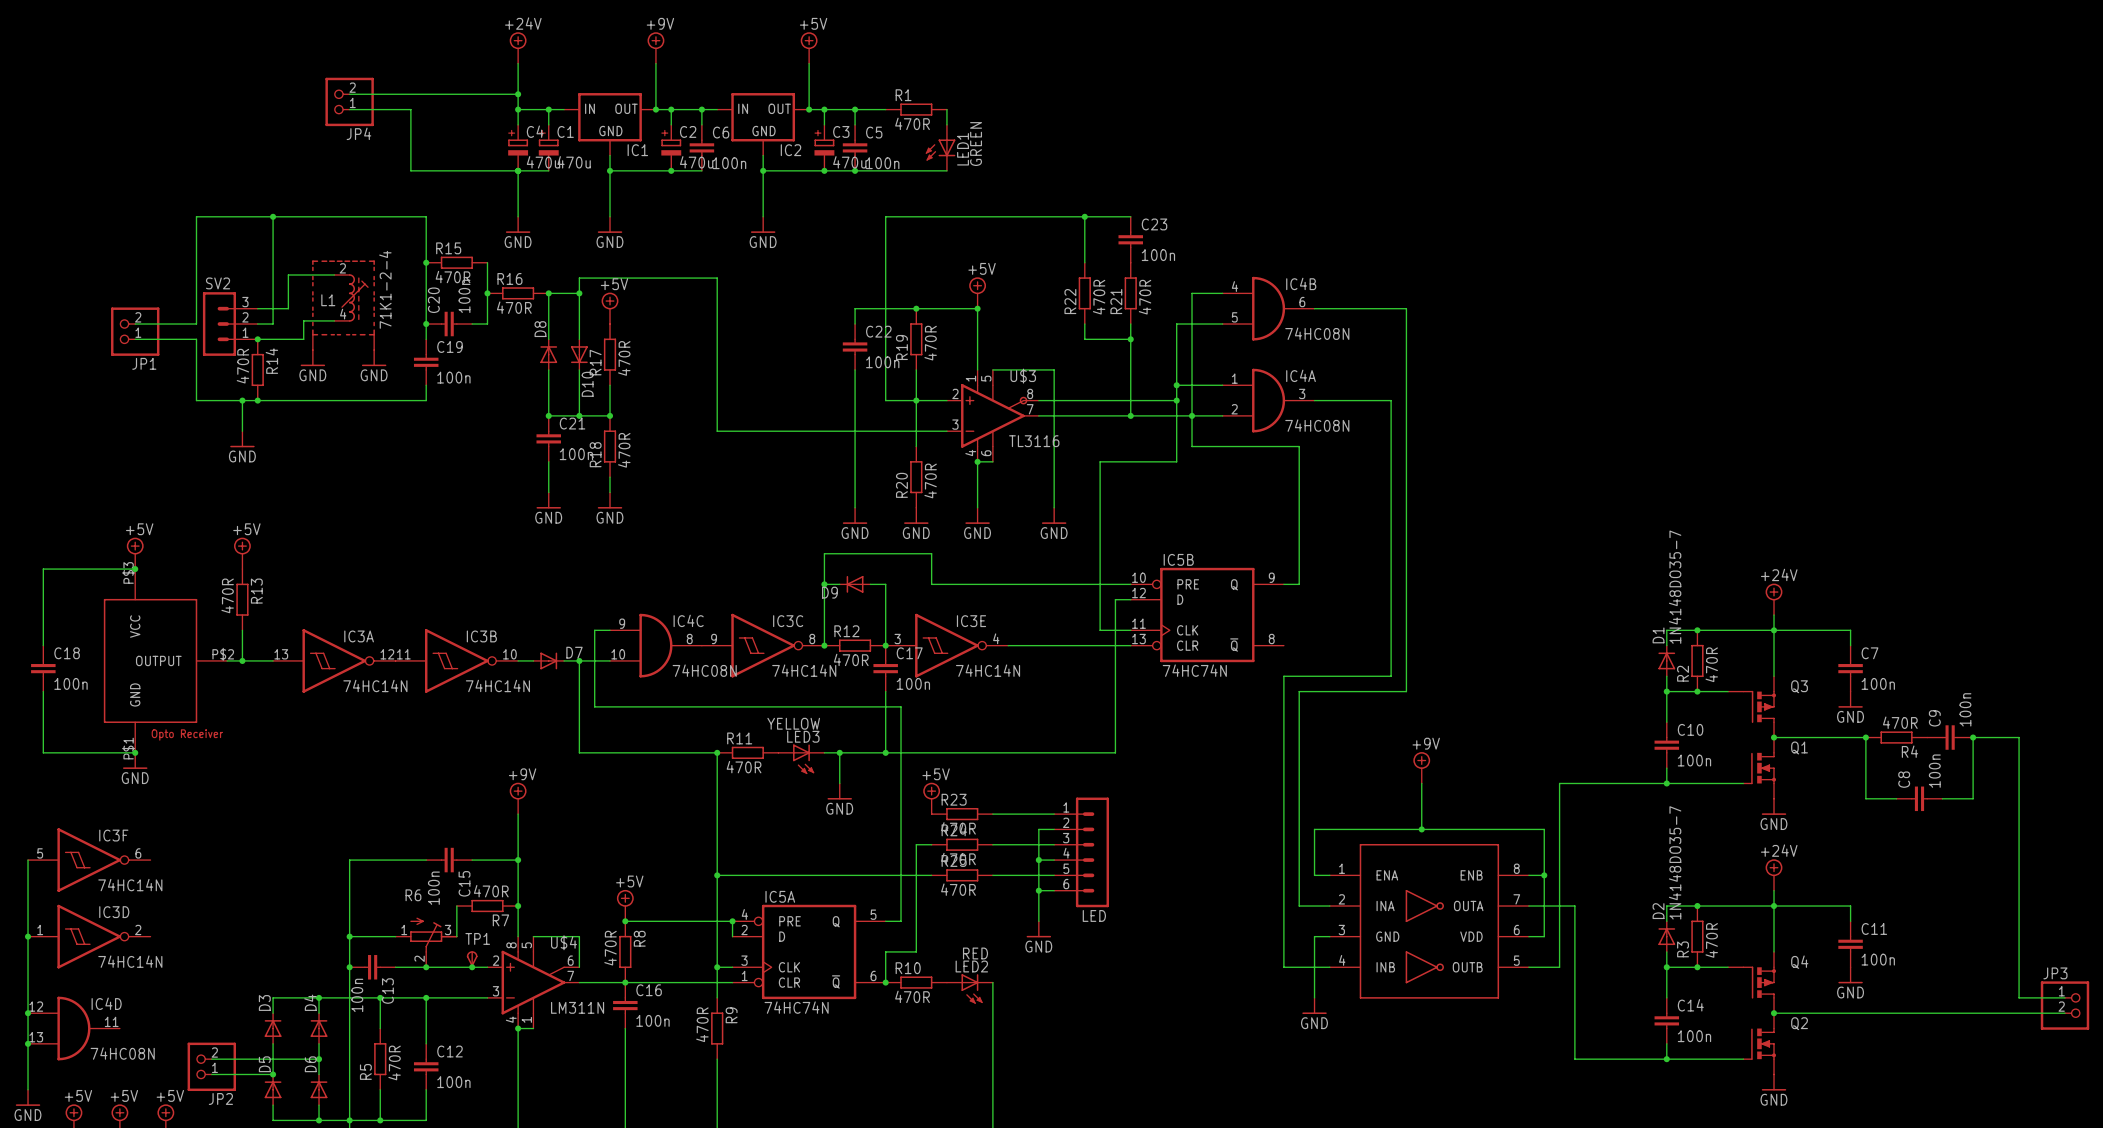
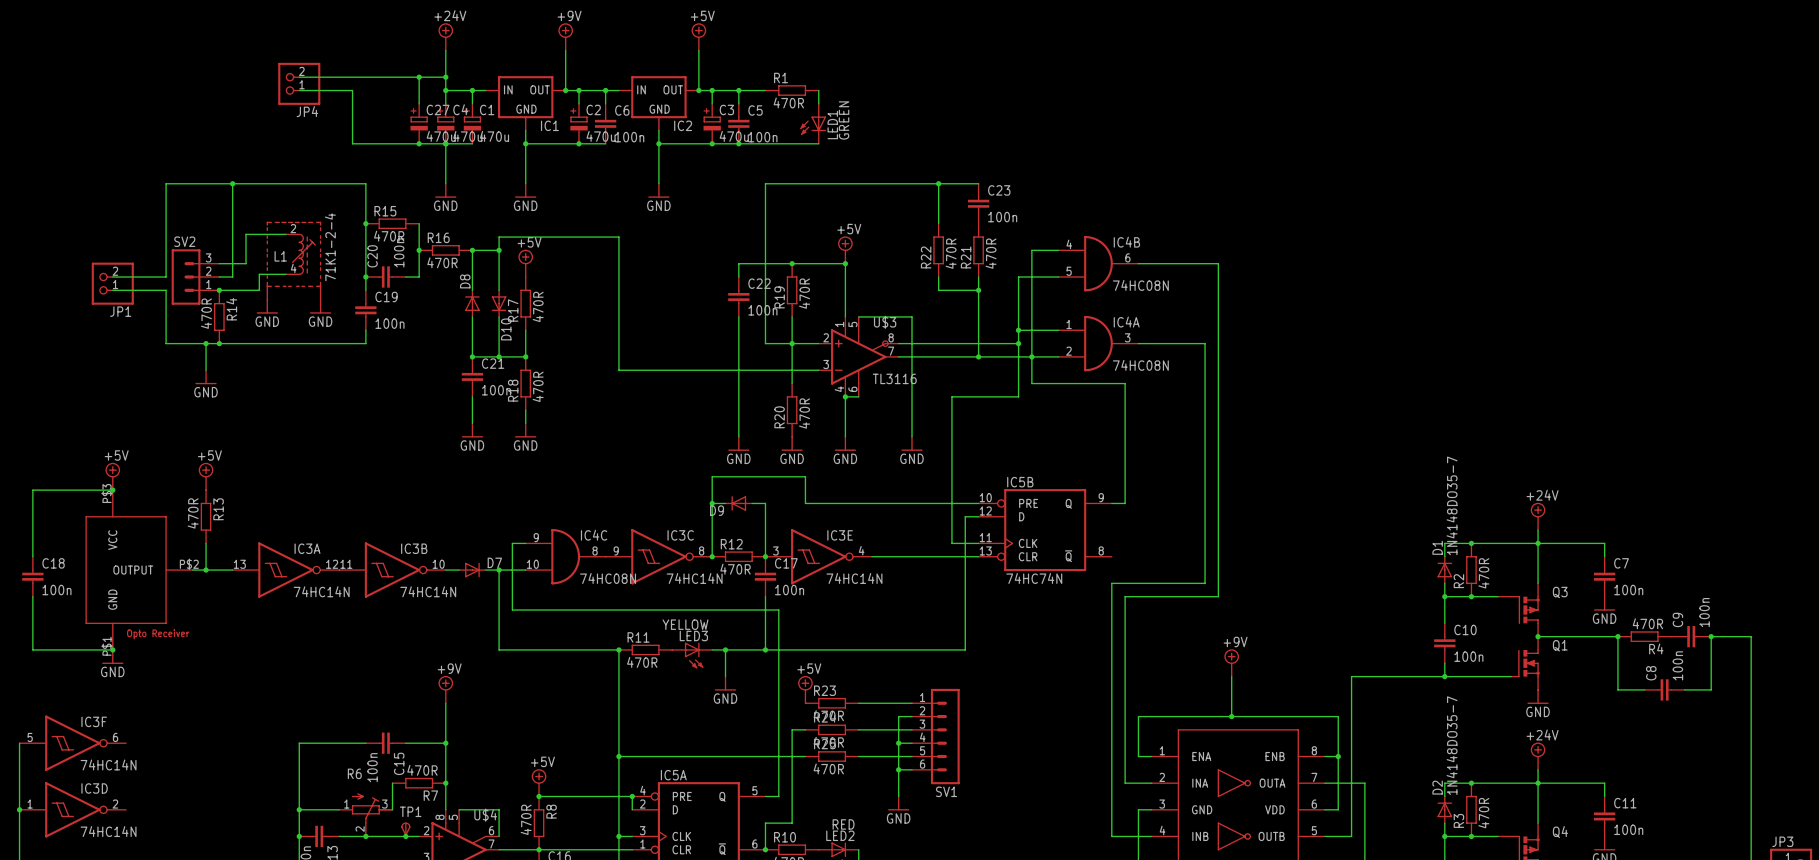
wire: none -> (419, 77) (419, 103)
junction: none -> (419, 77)
C27: none -> 470u (419, 123)
junction: none -> (419, 143)
LED name: LED (1094, 915) -> SV1 (946, 791)

